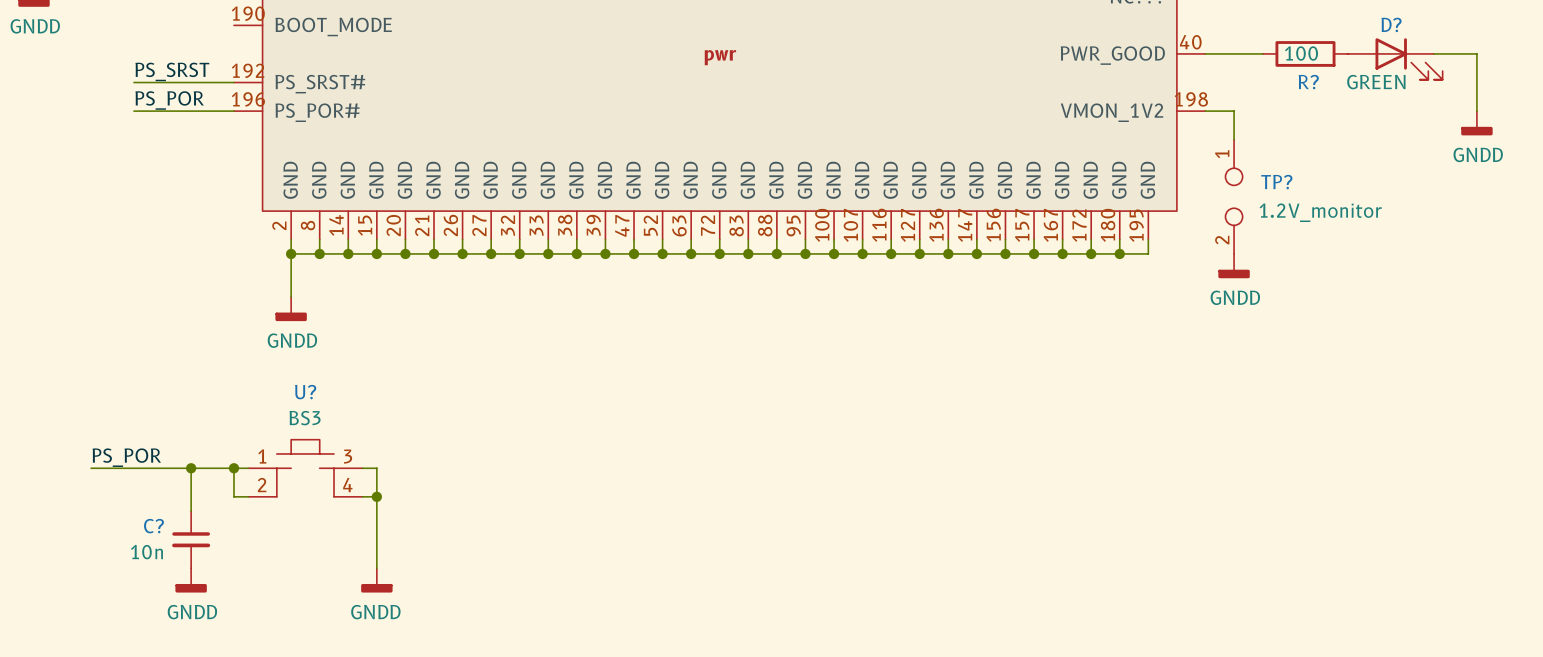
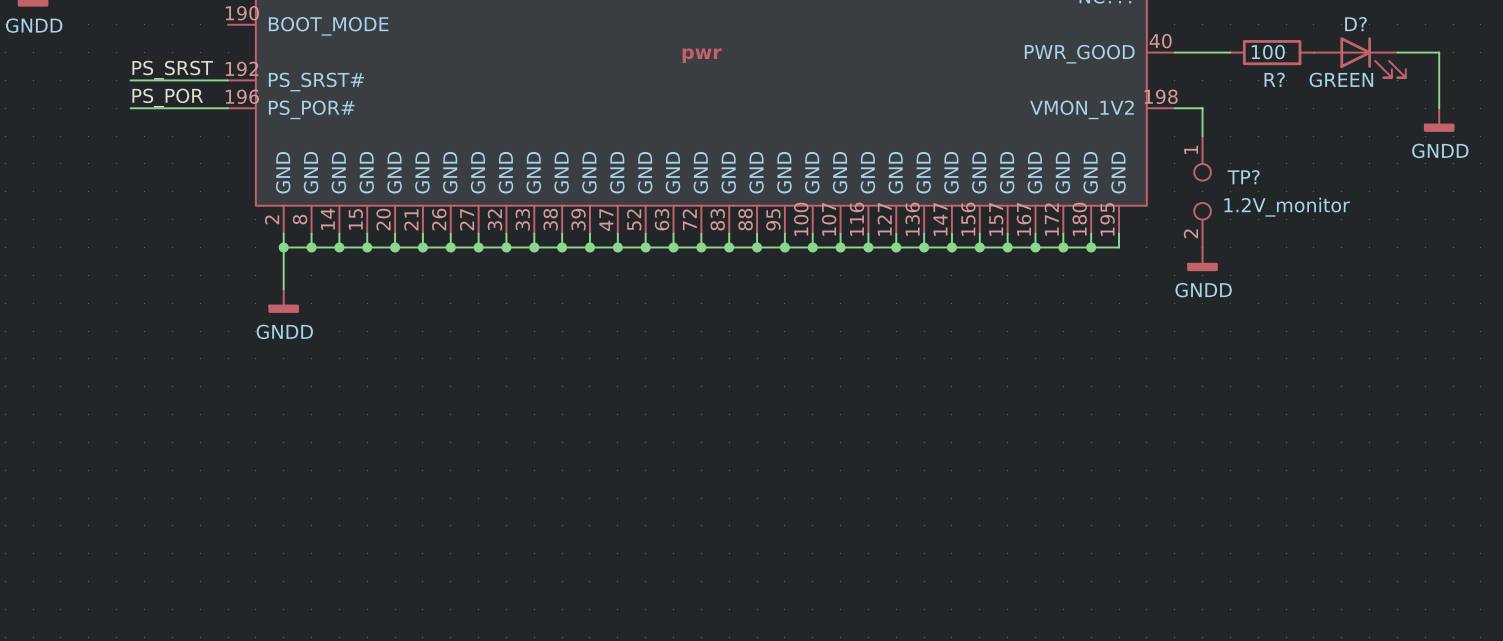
label: PS_POR (126, 457) -> none
wire: (91, 468) (248, 468) -> none
wire: (191, 468) (191, 511) -> none
junction: (191, 468) -> none
wire: (233, 468) (233, 496) (248, 496) -> none
junction: (233, 468) -> none
U?: BS3 (305, 468) -> none
wire: (362, 468) (376, 468) (376, 568) -> none
wire: (362, 496) (376, 496) -> none
junction: (376, 496) -> none
C?: 10n (191, 539) -> none
power symbol: GNDD (191, 580) -> none
power symbol: GNDD (376, 580) -> none

